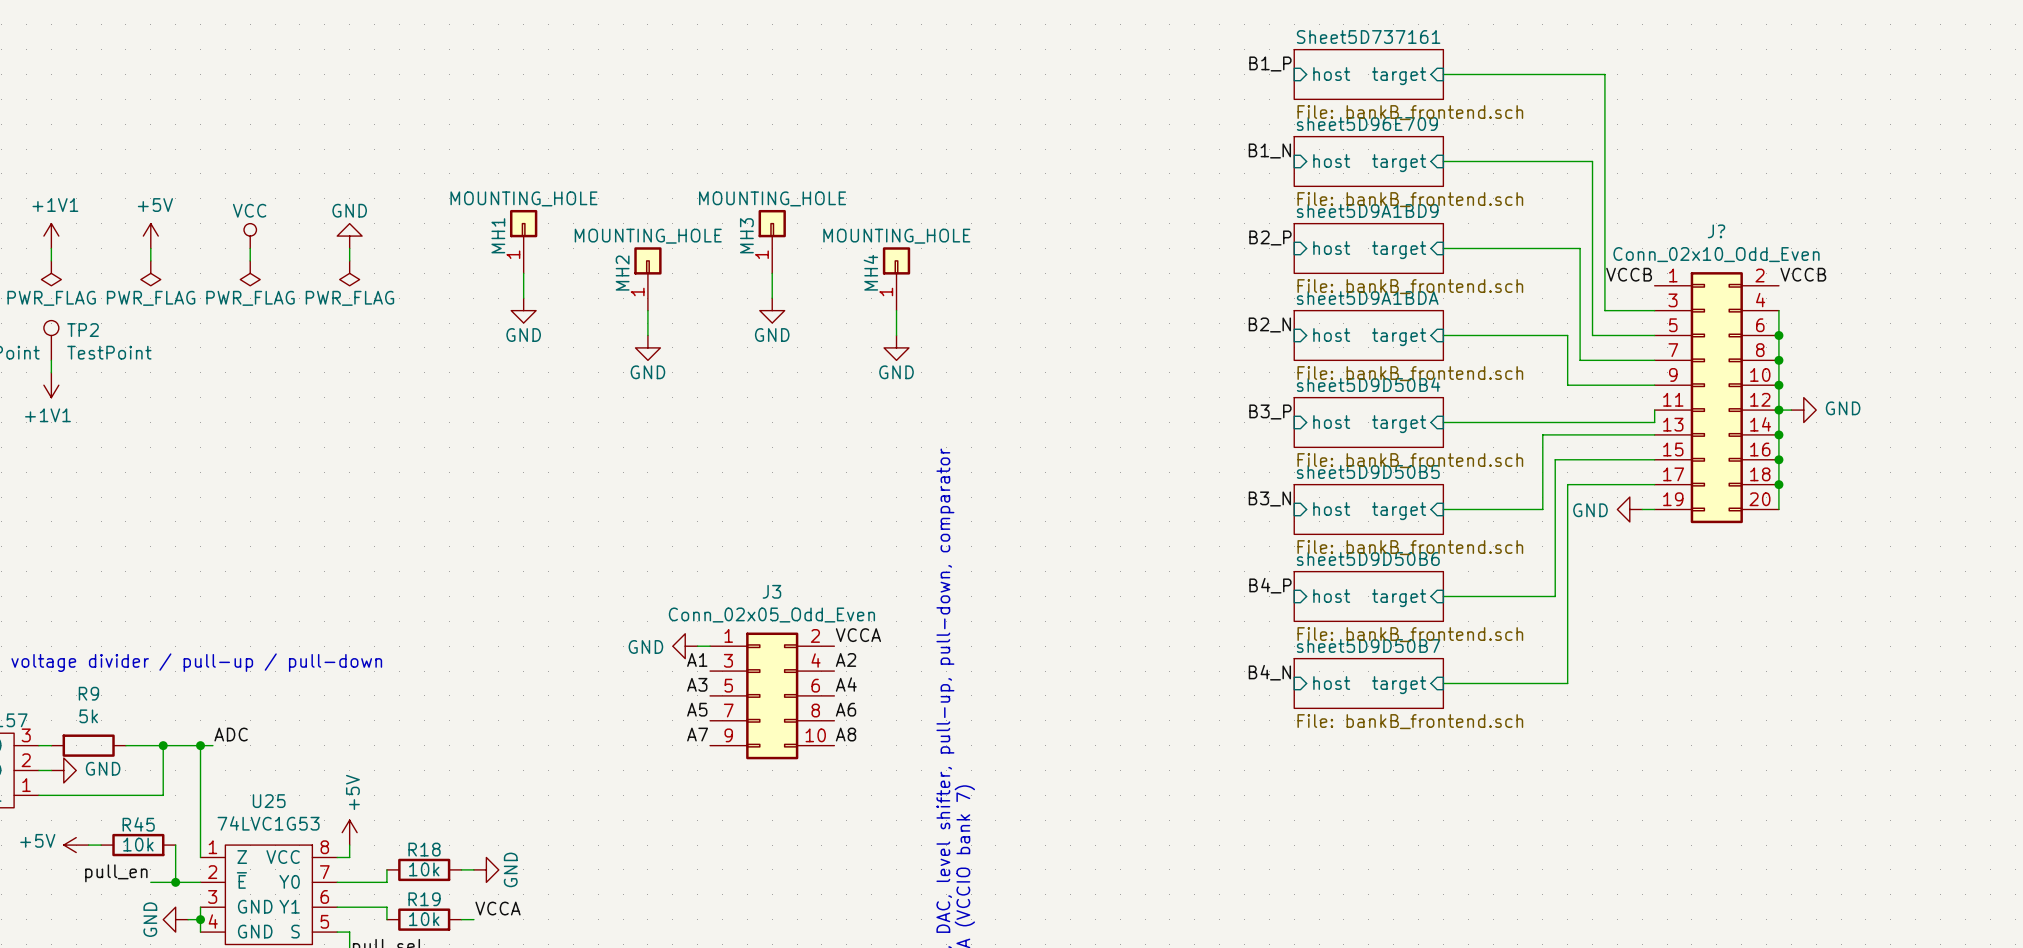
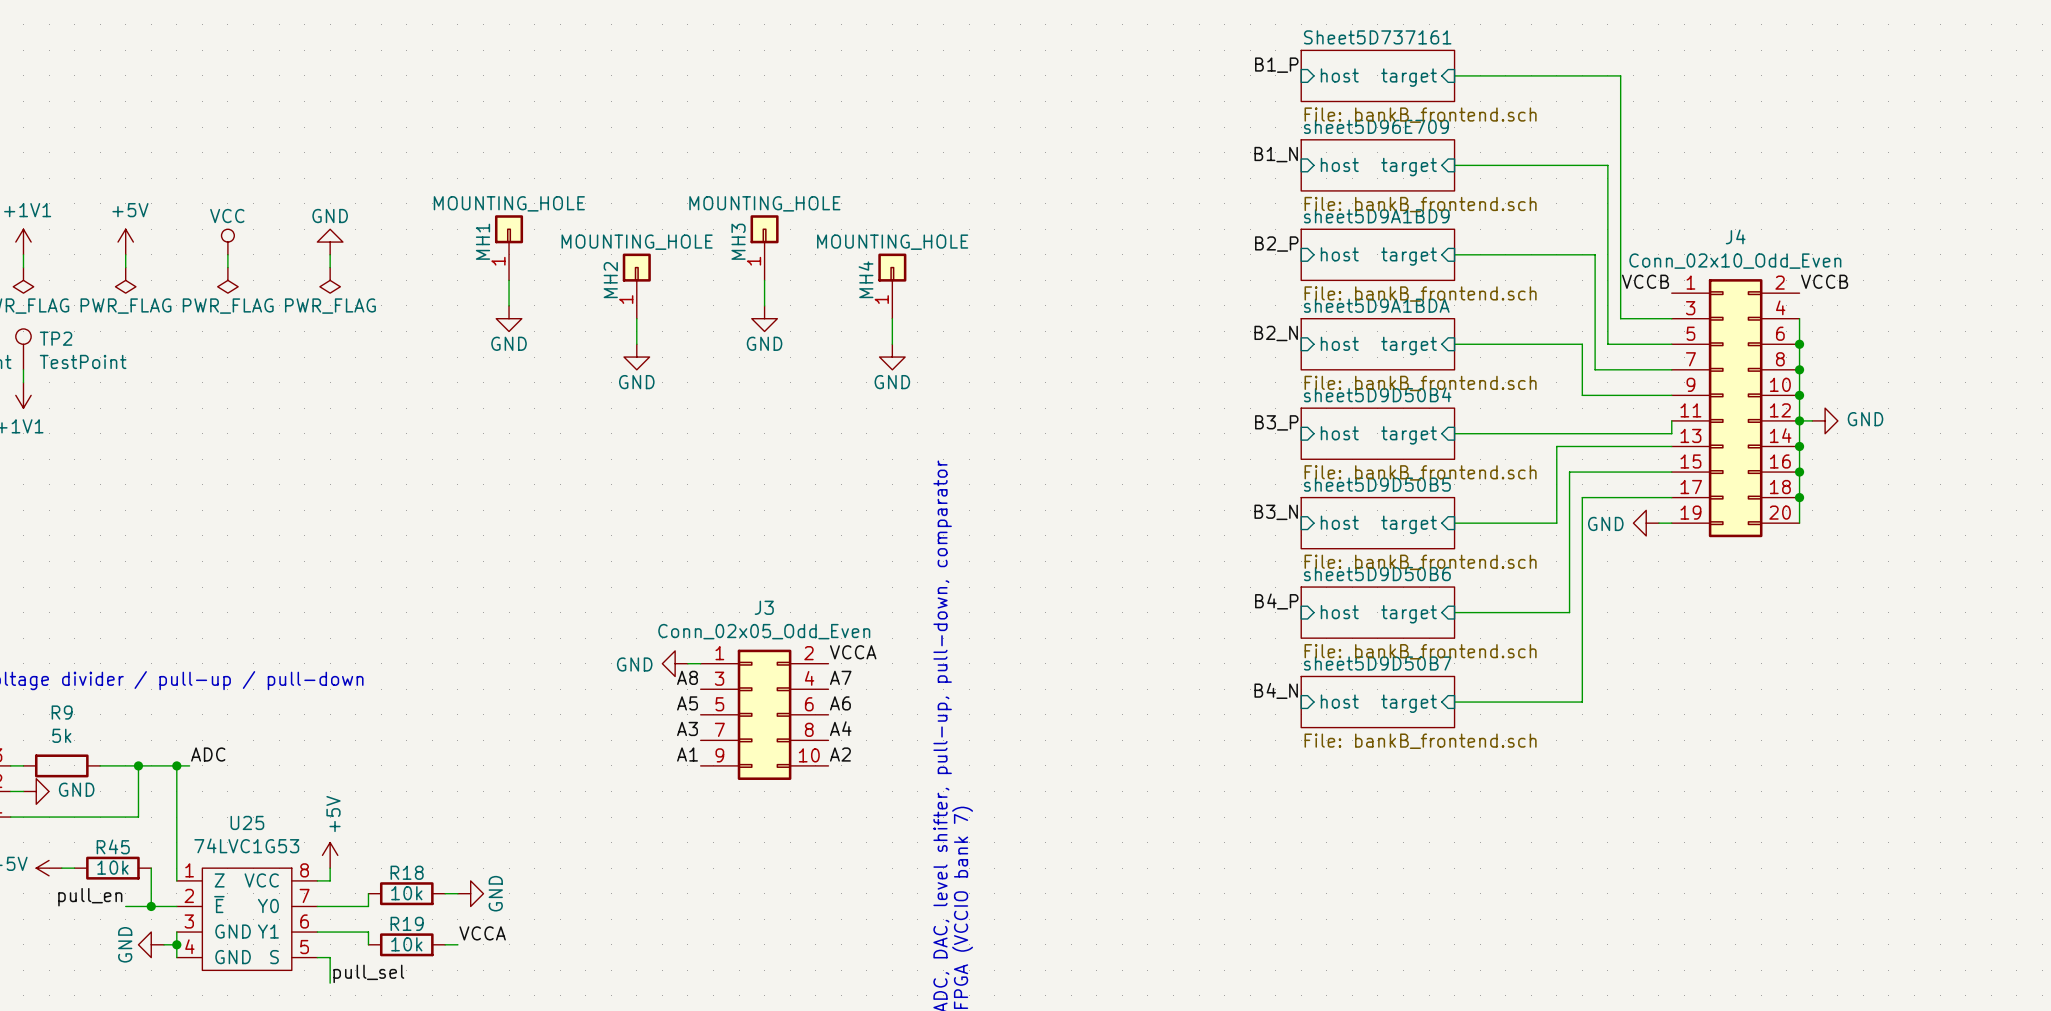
J? name: J? (1716, 231) -> J4 (1735, 236)
label: A1 (697, 659) -> A8 (687, 677)
label: A2 (846, 659) -> A7 (840, 677)
label: A3 (697, 684) -> A5 (687, 703)
label: A4 (846, 684) -> A6 (840, 703)
label: A5 (697, 709) -> A3 (687, 728)
label: A6 (846, 709) -> A4 (840, 728)
label: A7 (697, 734) -> A1 (687, 754)
label: A8 (846, 734) -> A2 (840, 754)

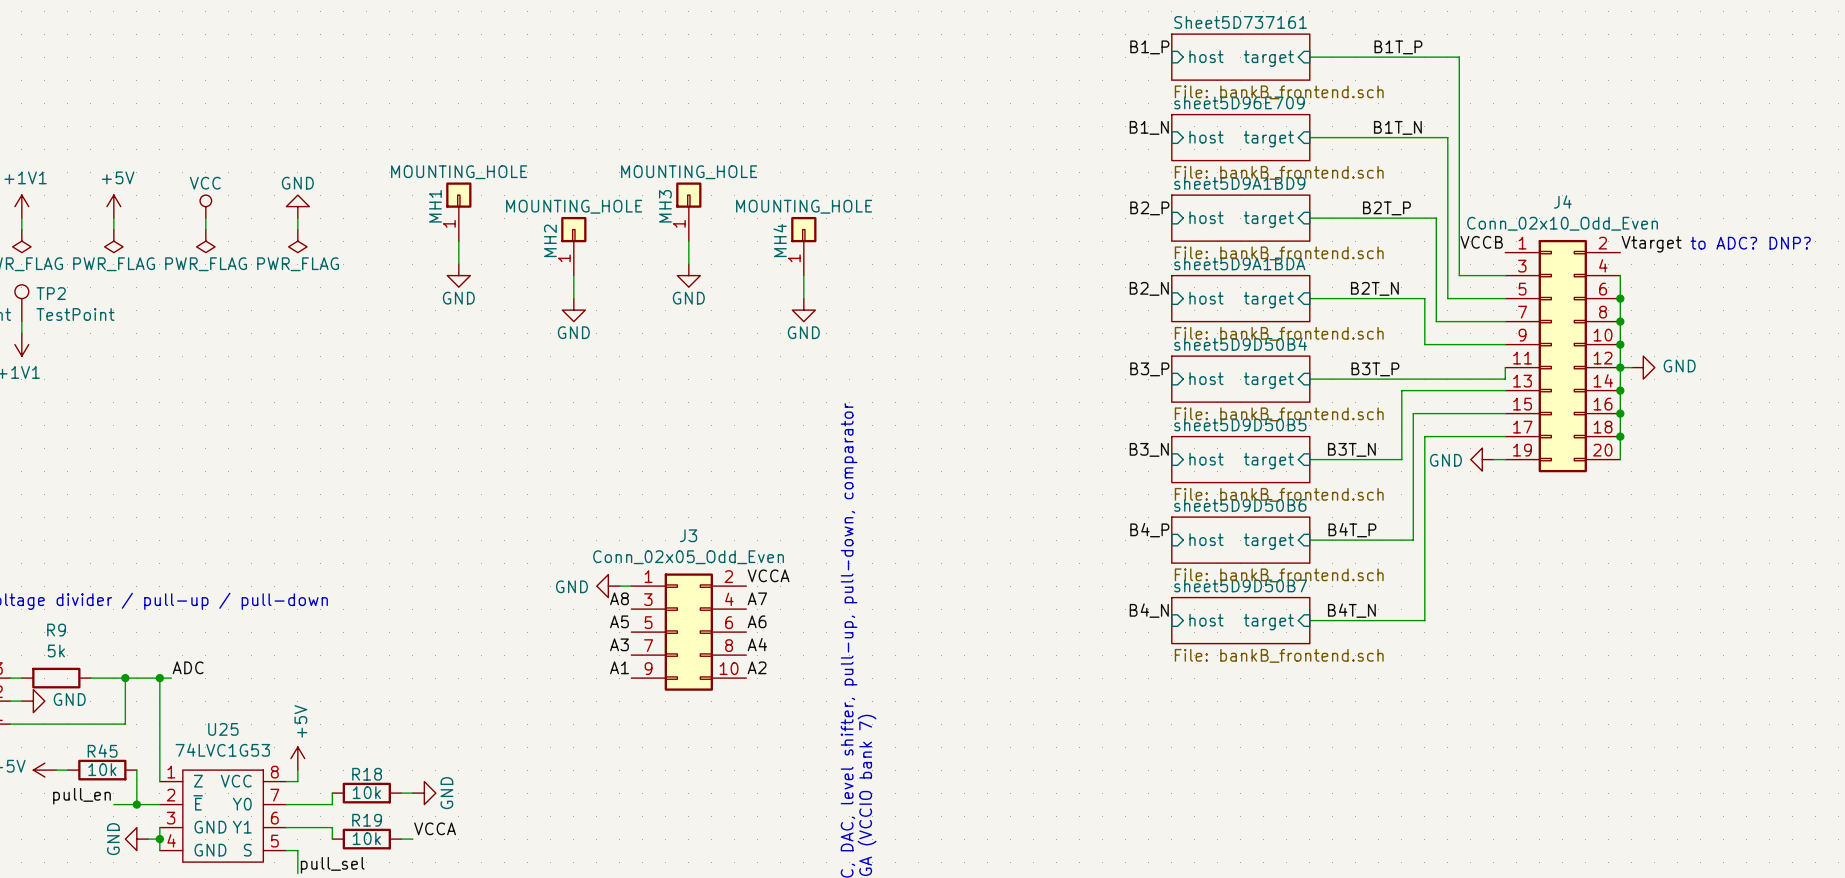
label: none -> B1T_P (1398, 47)
label: none -> B1T_N (1397, 127)
label: none -> B2T_P (1386, 208)
label: VCCB (1824, 281) -> Vtarget (1651, 244)
text: none -> to ADC? DNP? (1750, 243)
label: none -> B2T_N (1374, 288)
label: none -> B3T_P (1375, 369)
label: none -> B3T_N (1351, 449)
label: none -> B4T_P (1352, 530)
label: none -> B4T_N (1351, 610)

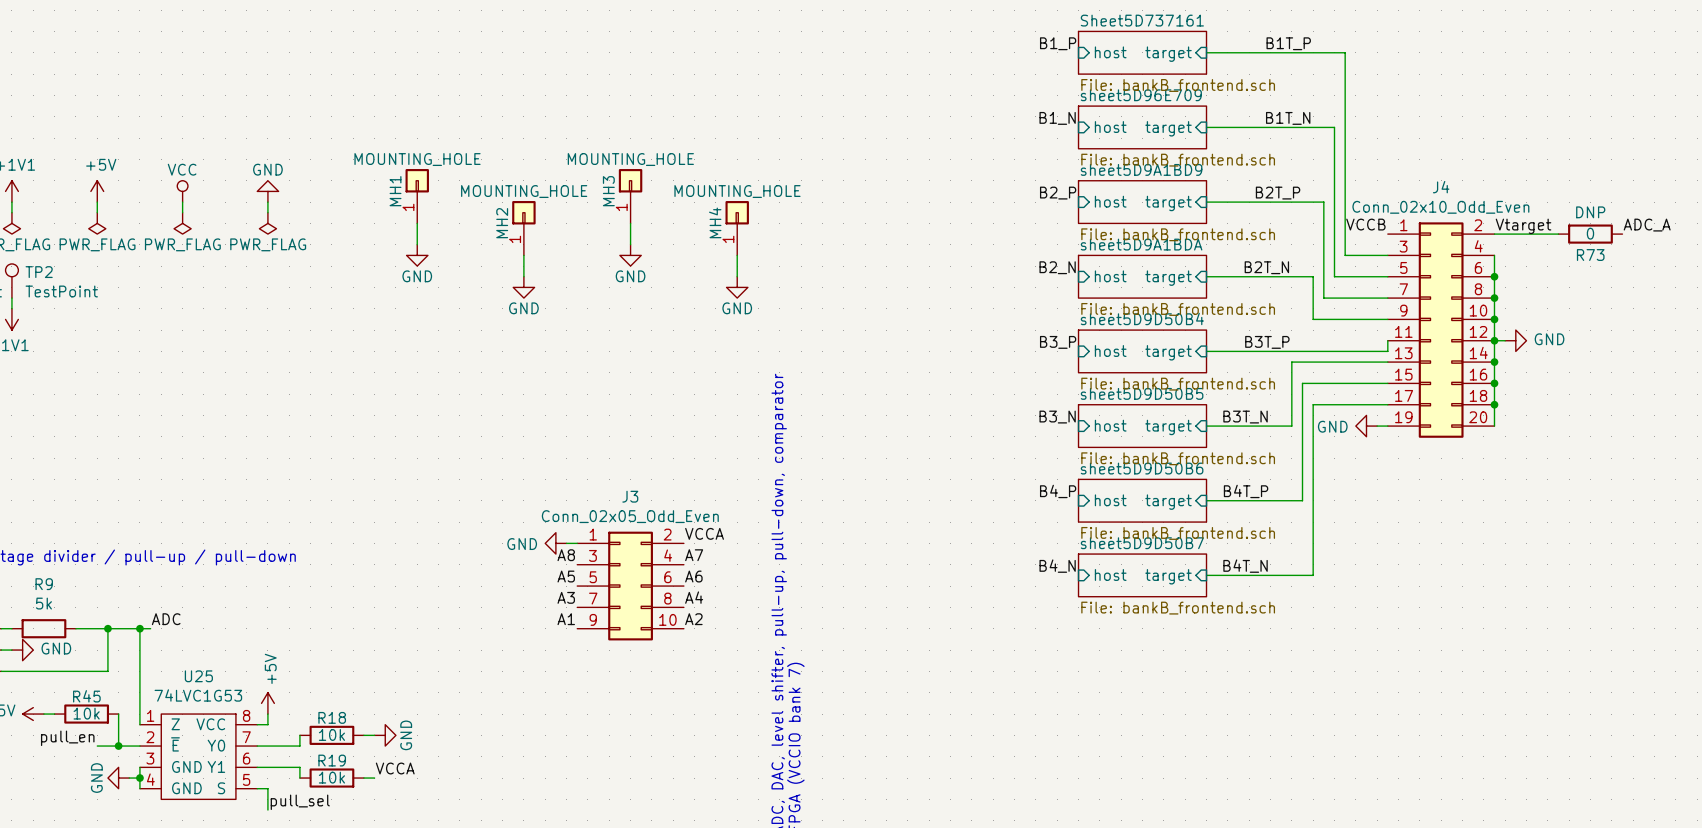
label: none -> ADC_A (1647, 225)
text: to ADC? DNP? (1750, 243) -> none
wire: none -> (1494, 234) (1558, 234)
R73: none -> 0 (1590, 234)

